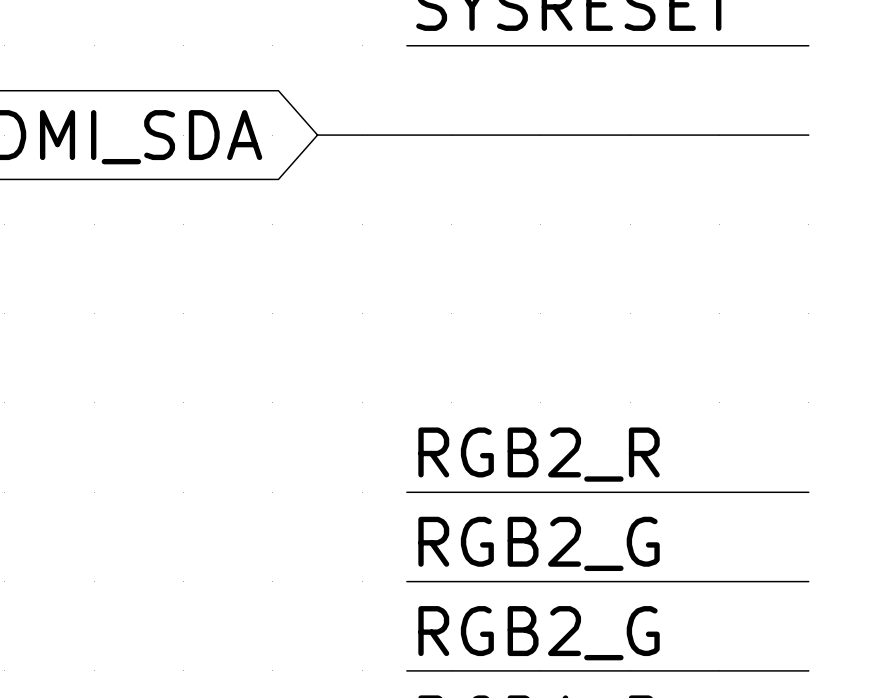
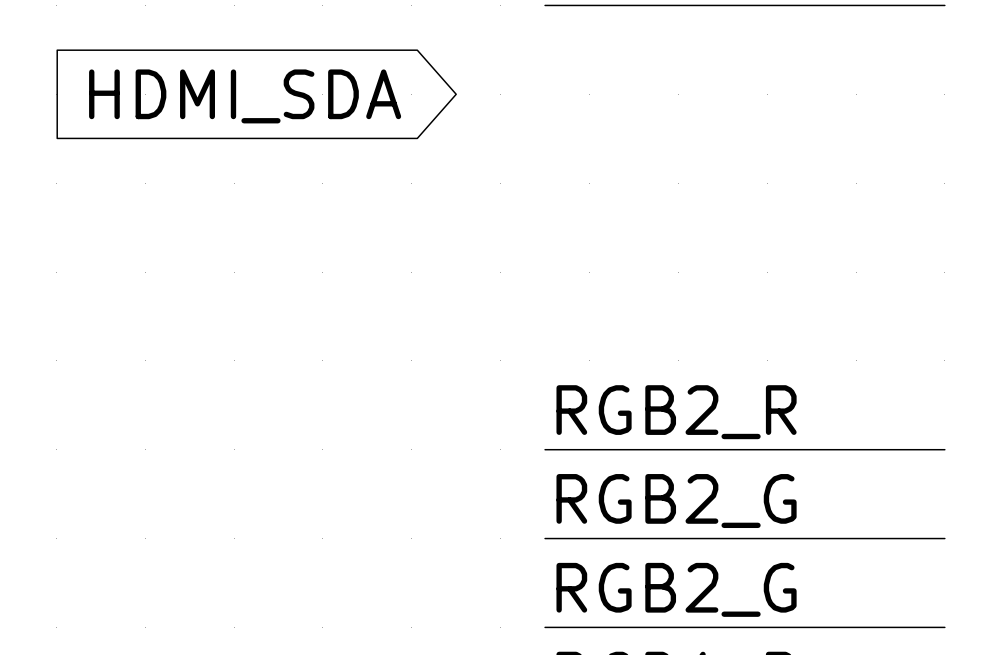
wire: (317, 135) (808, 135) -> none

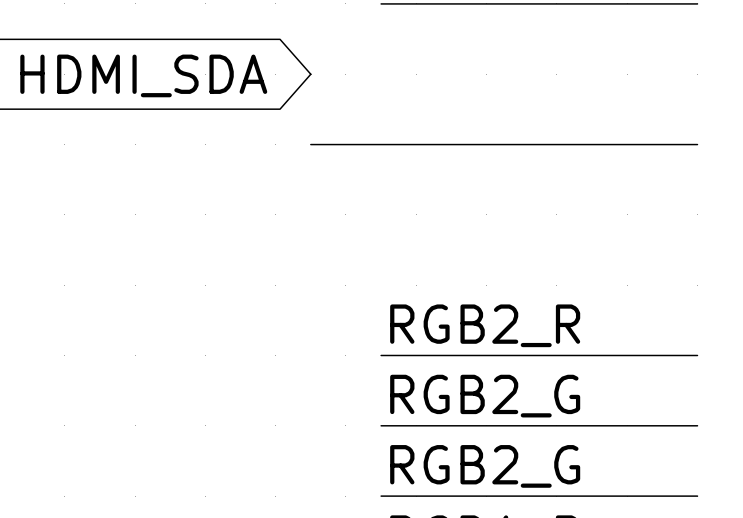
wire: none -> (310, 144) (697, 144)

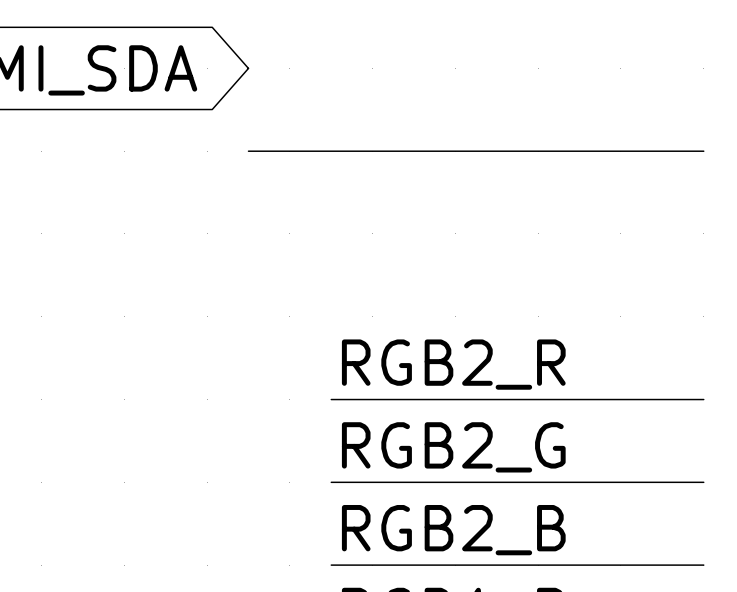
label: RGB2_G (485, 466) -> RGB2_B (453, 530)

